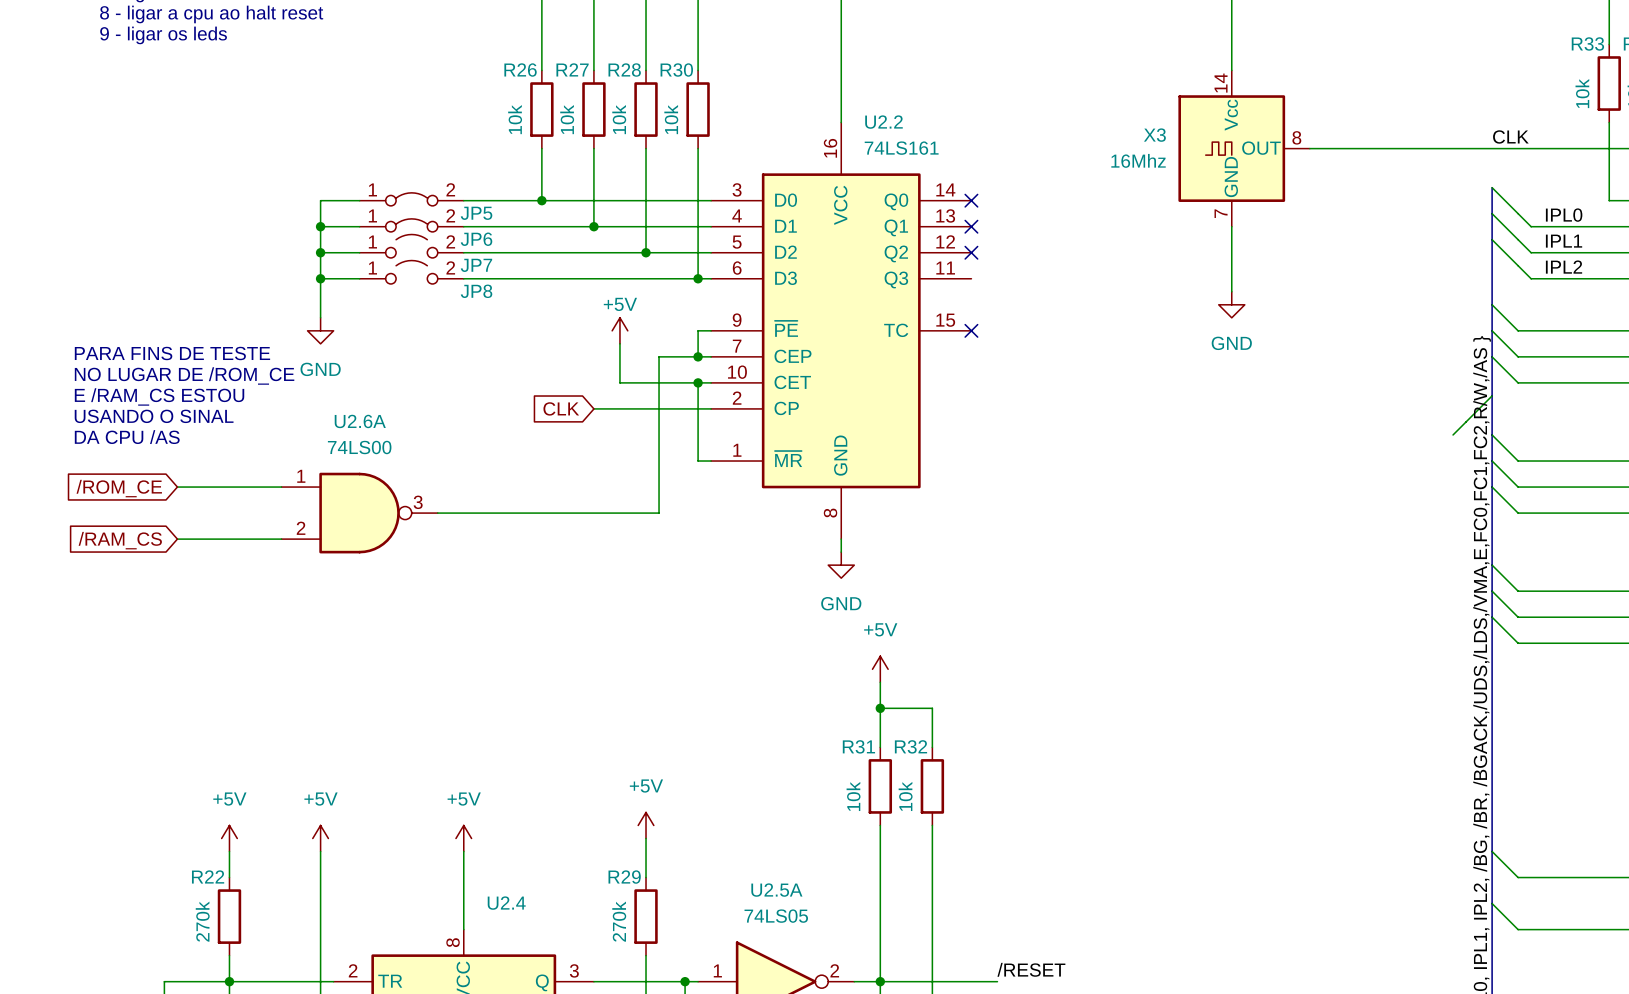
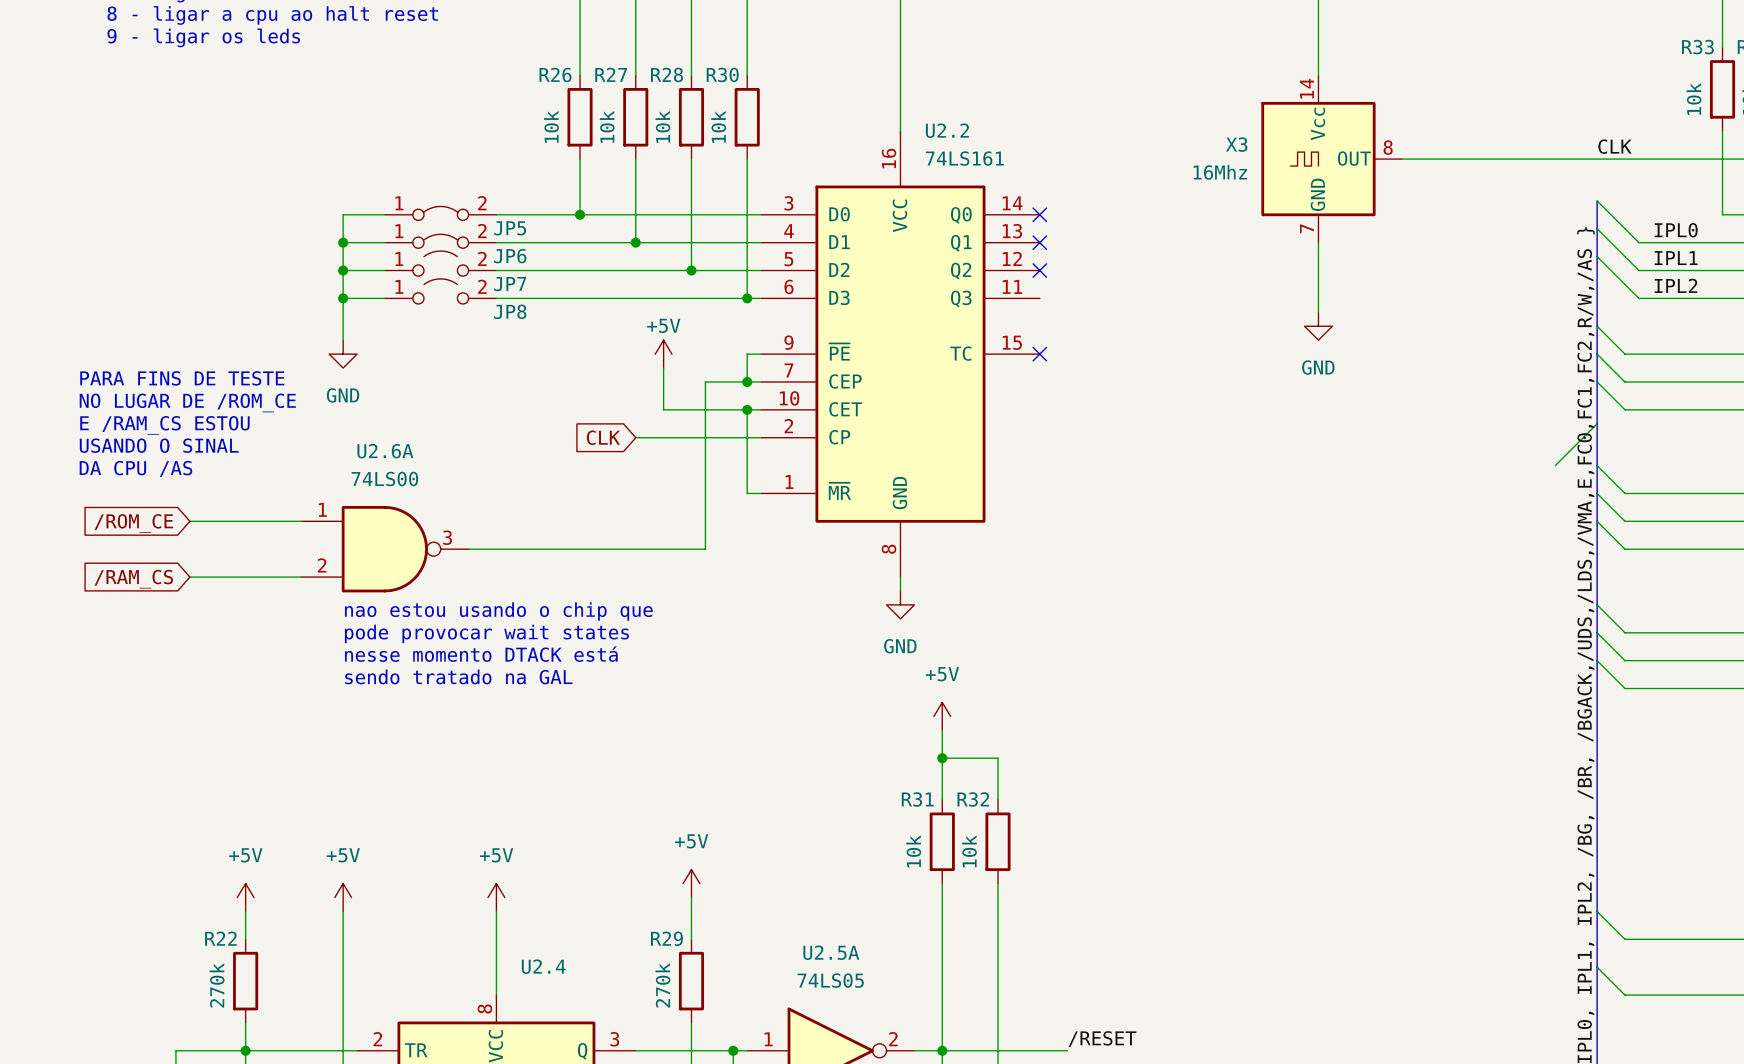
text: none -> nao estou usando o chip que (498, 611)
text: none -> pode provocar wait states (486, 633)
text: none -> nesse momento DTACK está (481, 654)
text: none -> sendo tratado na GAL (458, 676)

